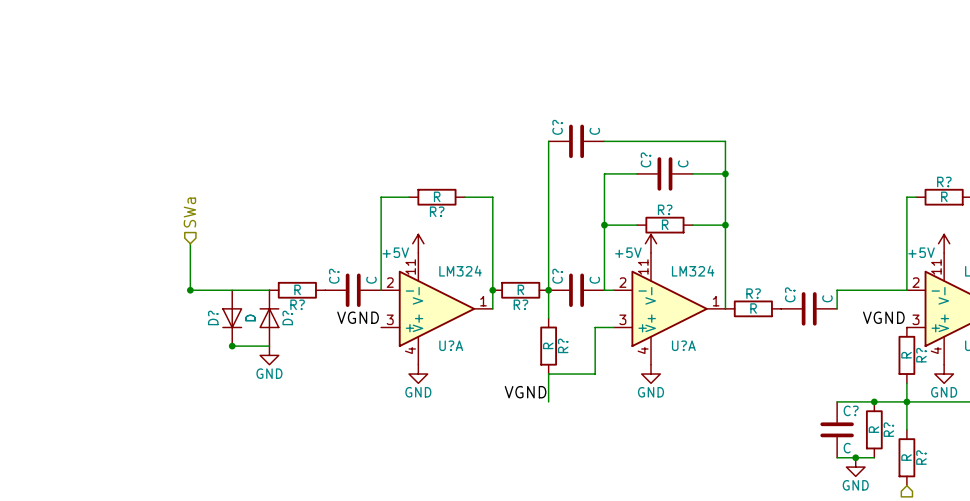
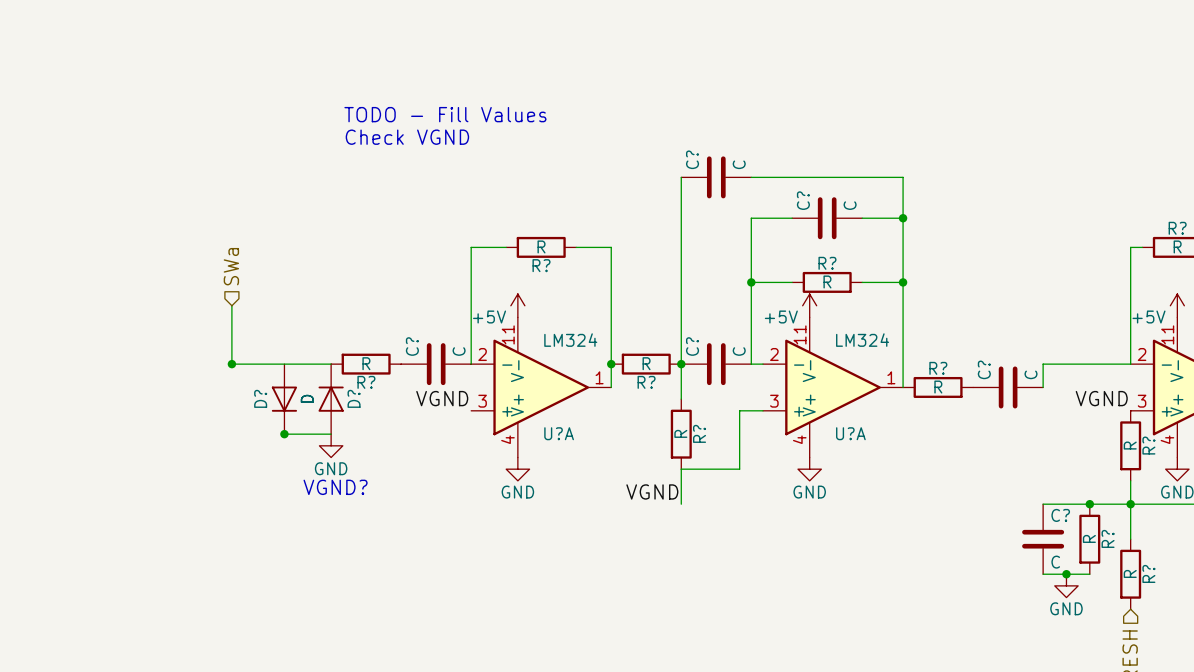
text: none -> TODO - Fill Values (445, 114)
text: none -> Check VGND (407, 137)
text: none -> VGND? (335, 487)

